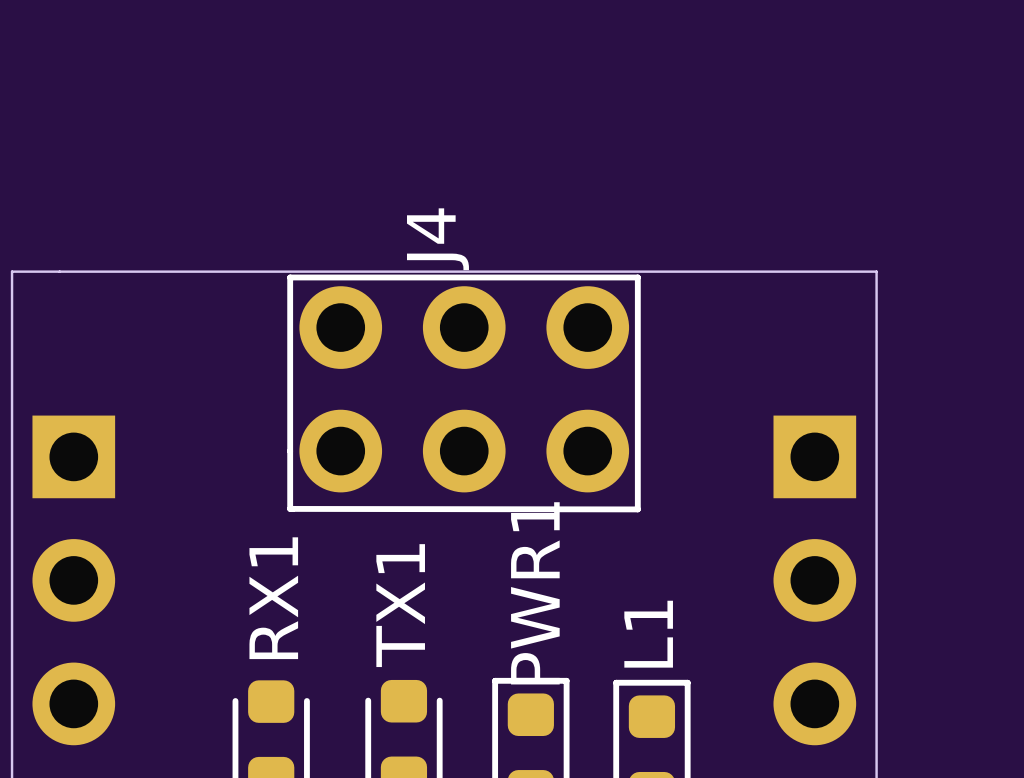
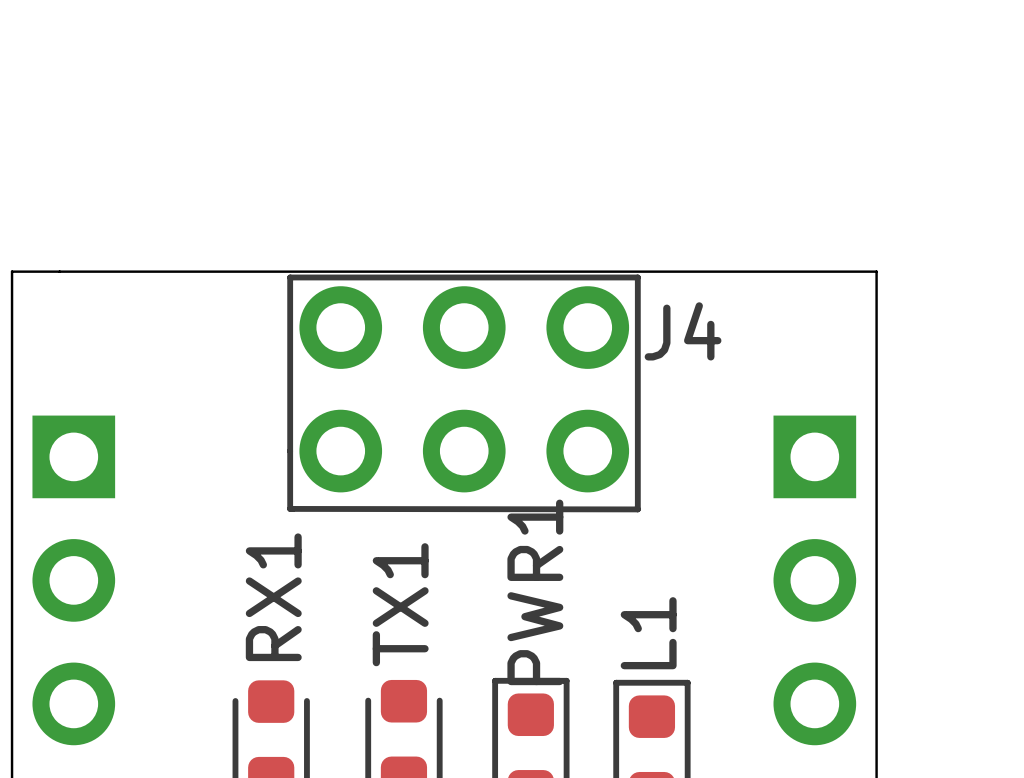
J4 name rotation: 0° (437, 239) -> 90° clockwise (683, 331)
J4 name position: J4 (437, 239) -> J4 (683, 331)

